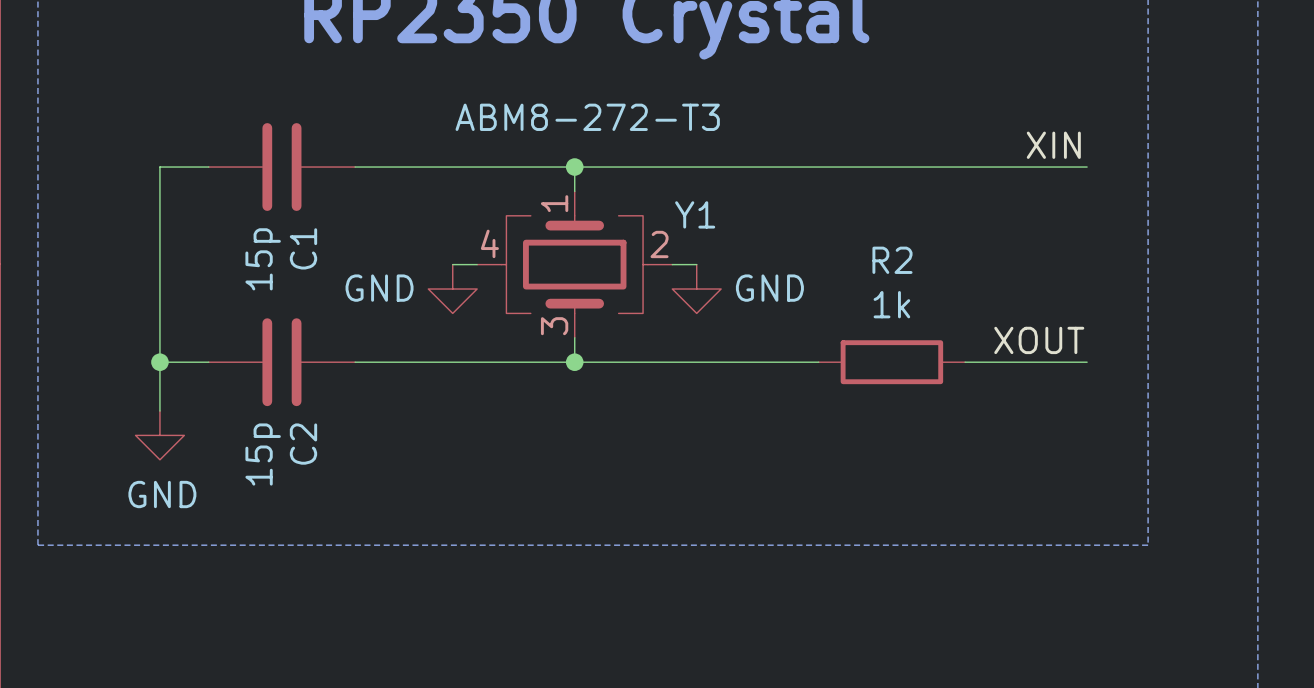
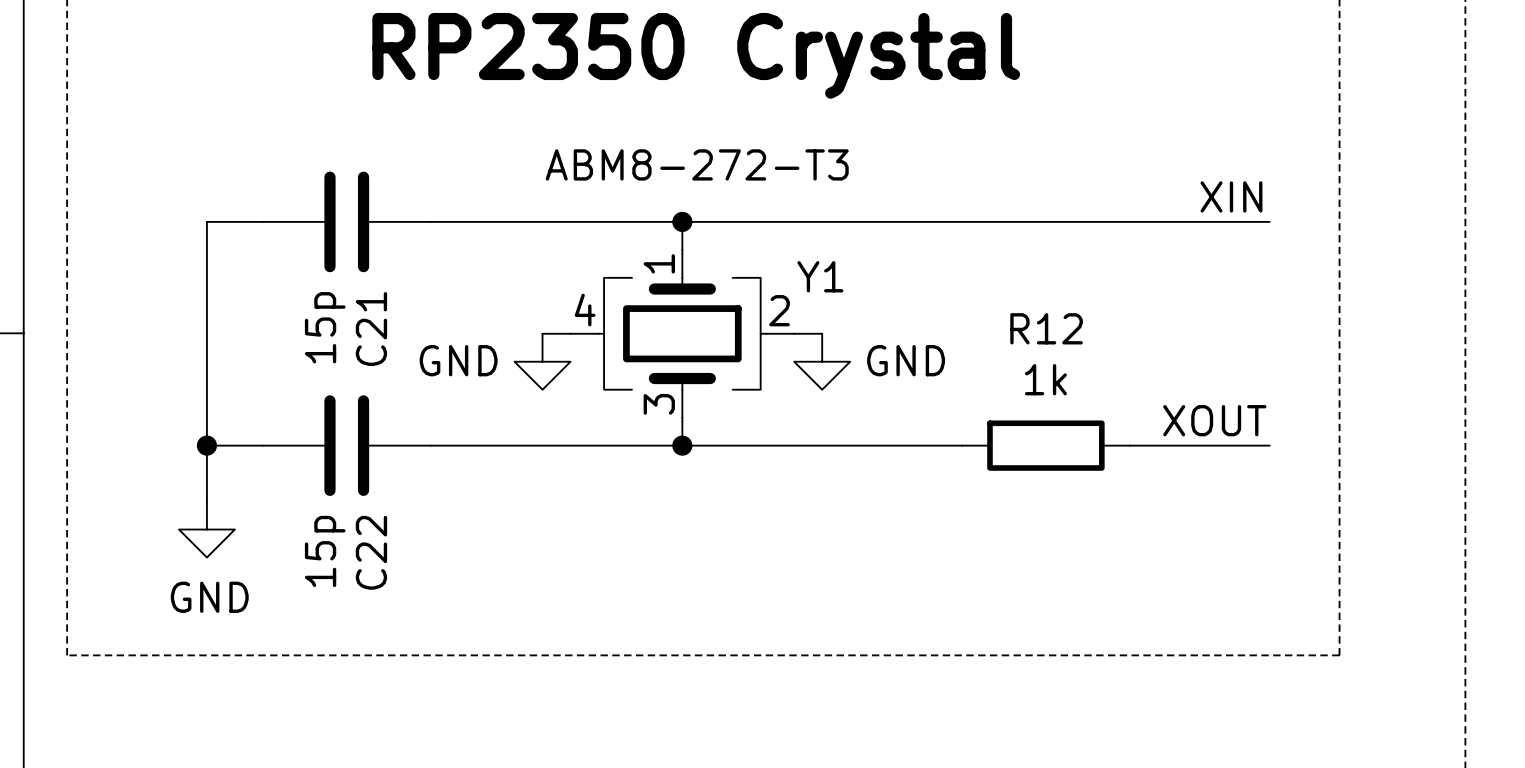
C1 name: C1 (303, 248) -> C21 (371, 329)
R2 name: R2 (892, 260) -> R12 (1046, 328)
C2 name: C2 (303, 444) -> C22 (371, 552)

